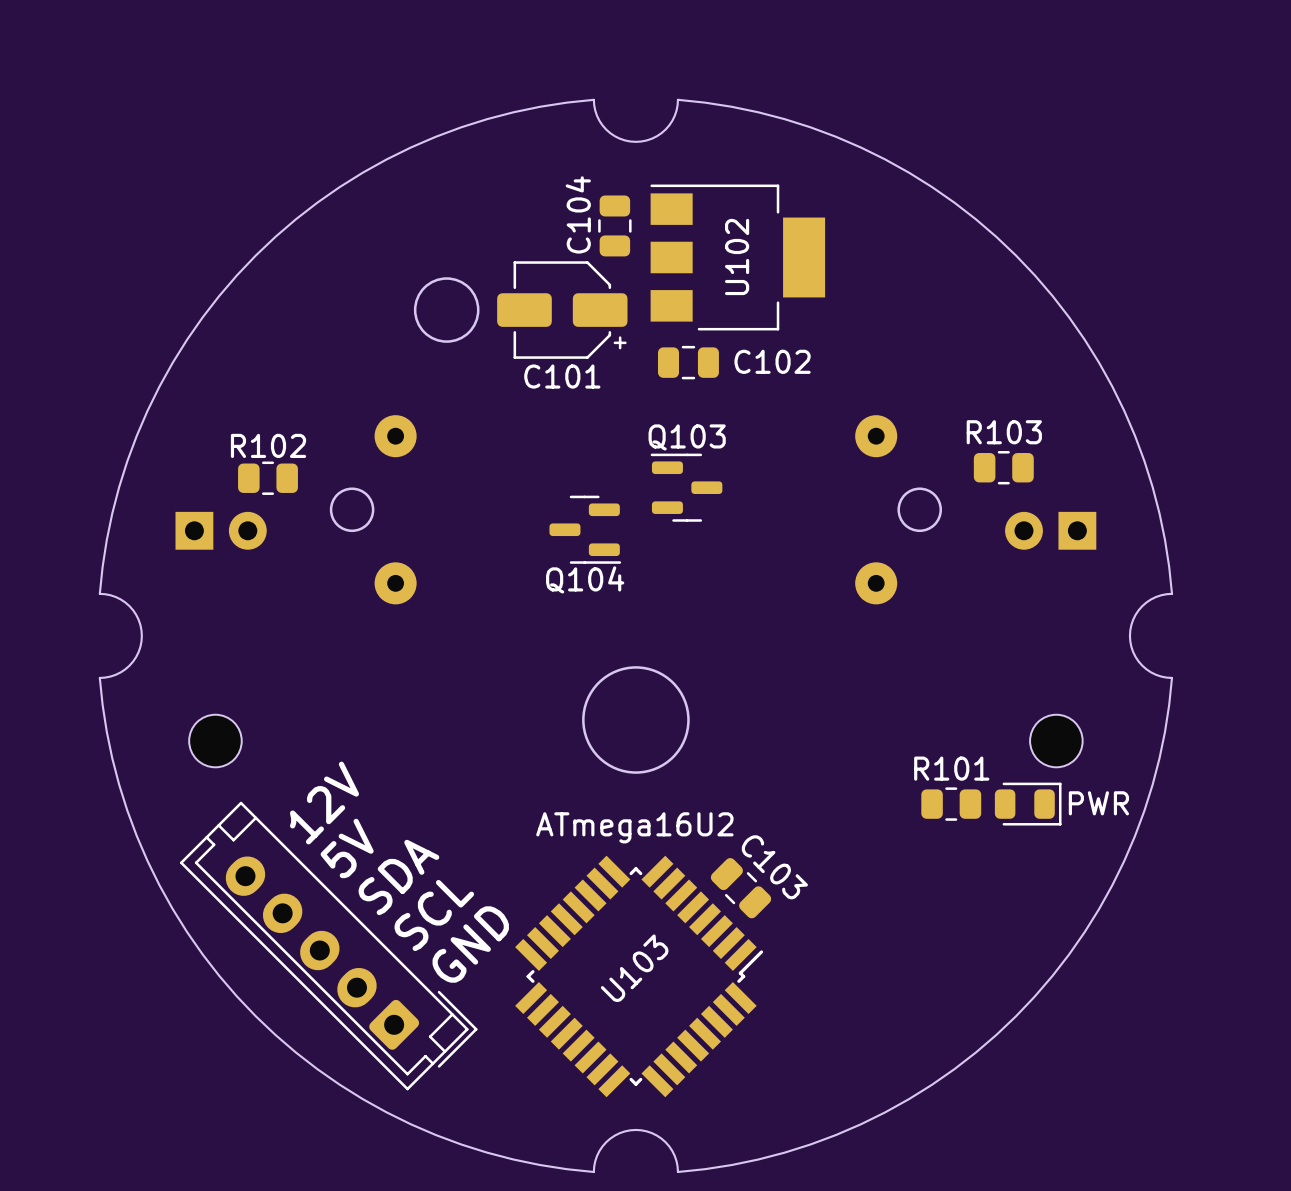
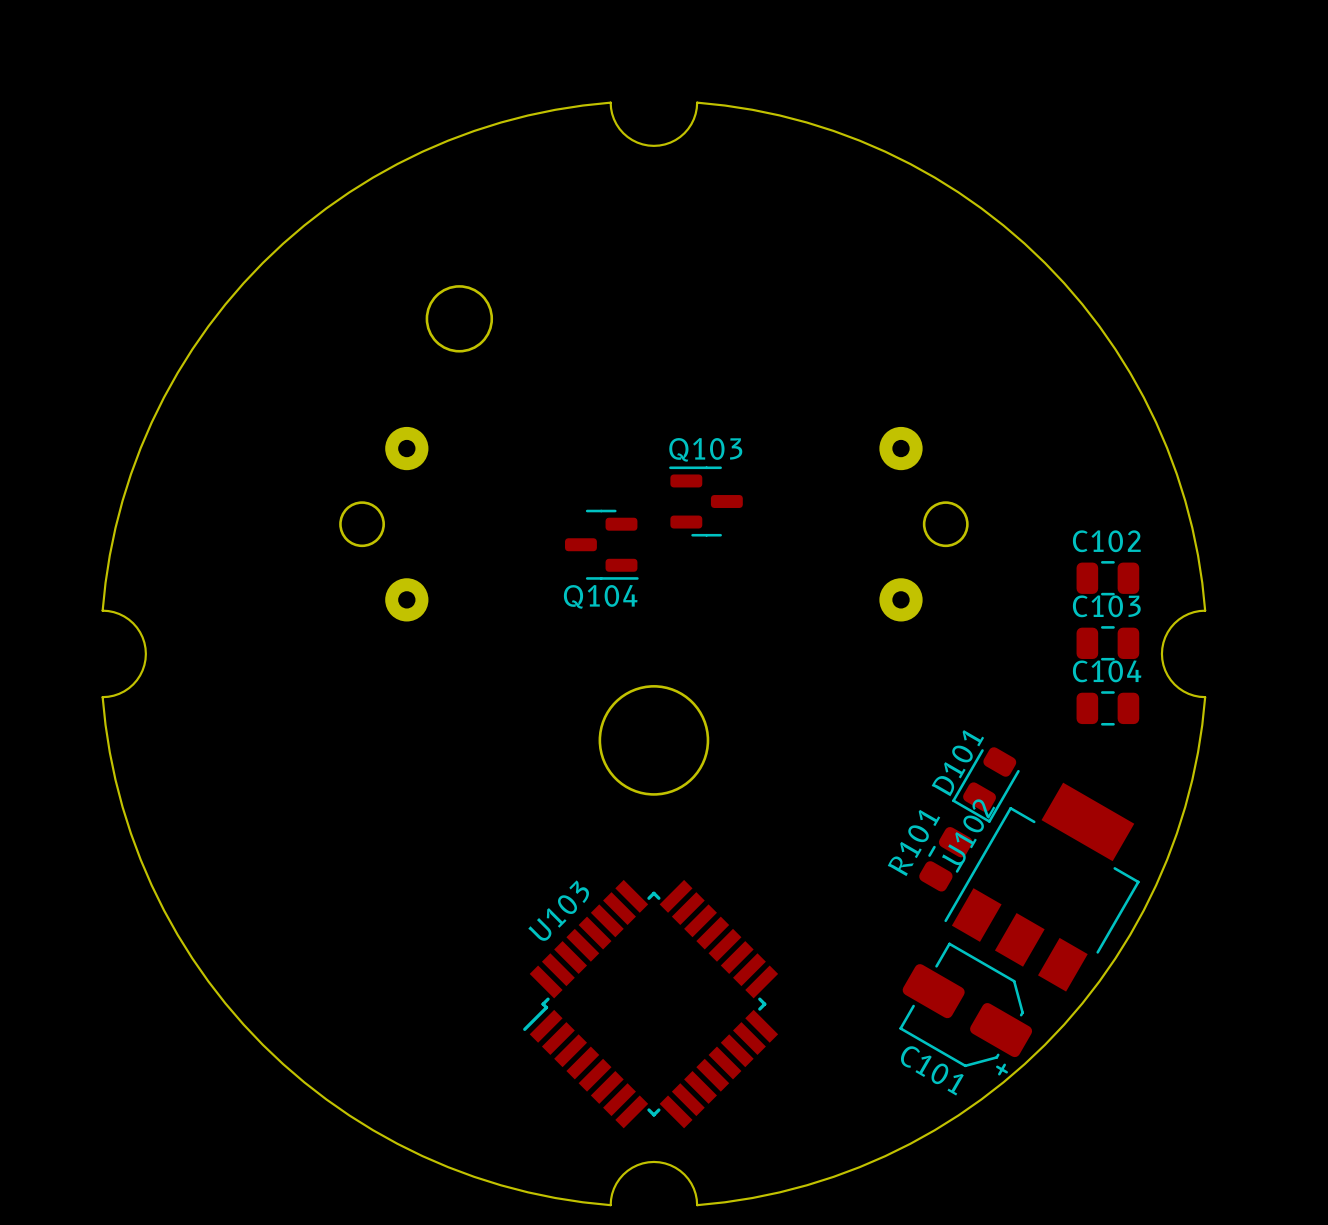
C104 rotation: 0° (614, 225) -> 90° clockwise (1107, 708)
C104 position: (614, 225) -> (1107, 708)
U102 name position: U102 (737, 256) -> U102 (968, 832)
U102 rotation: 0° (737, 257) -> 60° counterclockwise (1042, 887)
U102 position: (737, 257) -> (1042, 887)
C101 rotation: 0° (562, 310) -> 30° clockwise (965, 1009)
C101 position: (562, 310) -> (965, 1009)
C102 name position: C102 (772, 361) -> C102 (1106, 541)
C102 position: (688, 362) -> (1107, 578)
R103: (1003, 467) -> none
R102: (268, 478) -> none
part: (221, 530) -> none
part: (1050, 530) -> none
part: (215, 741) -> none
part: (1056, 741) -> none
D101: none -> (985, 785)
text: 12V (324, 803) -> none
R101 rotation: 0° (951, 804) -> 60° counterclockwise (945, 859)
R101 position: (951, 804) -> (945, 859)
part: PWR (1028, 804) -> none
U103 value: ATmega16U2 (634, 827) -> none
text: 5V (347, 848) -> none
text: SDA (398, 877) -> none
C103 rotation: 0° (741, 888) -> 45° counterclockwise (1107, 643)
C103 position: (741, 888) -> (1107, 643)
text: SCL (434, 915) -> none
text: GND (470, 944) -> none
part: (328, 946) -> none
U103 name position: U103 (634, 968) -> U103 (558, 910)
U103 rotation: 0° (639, 976) -> 180° (650, 1004)

